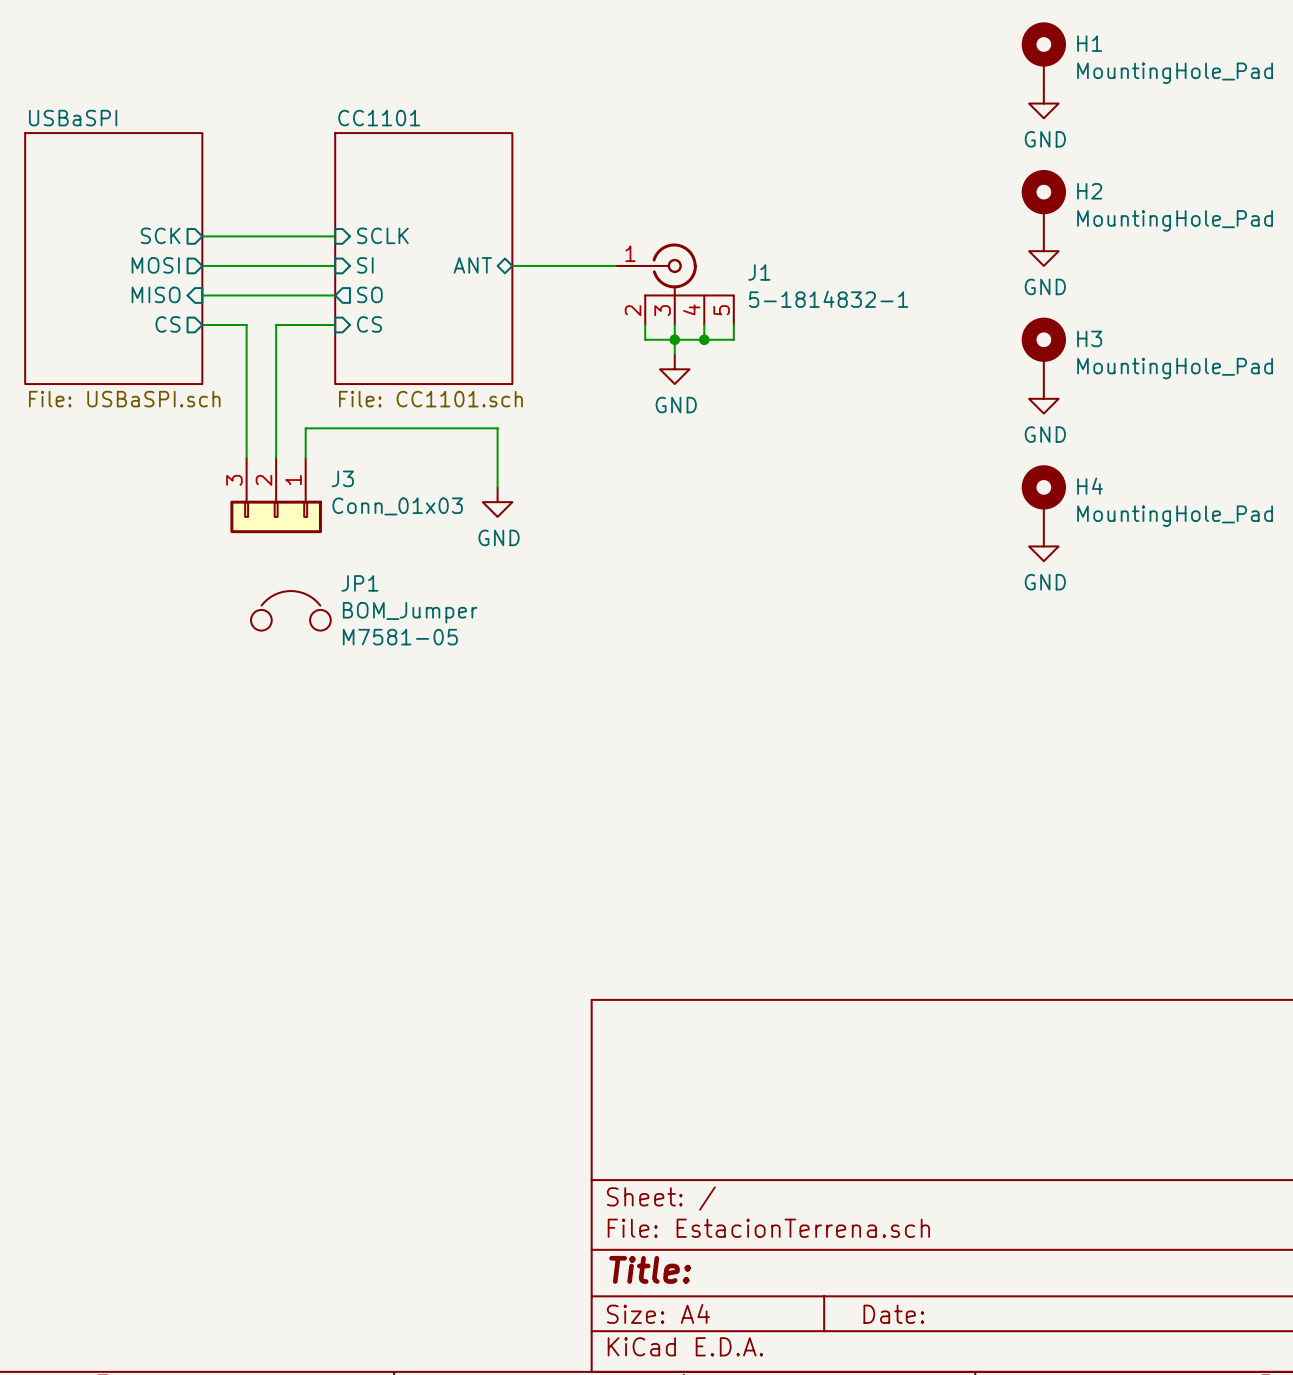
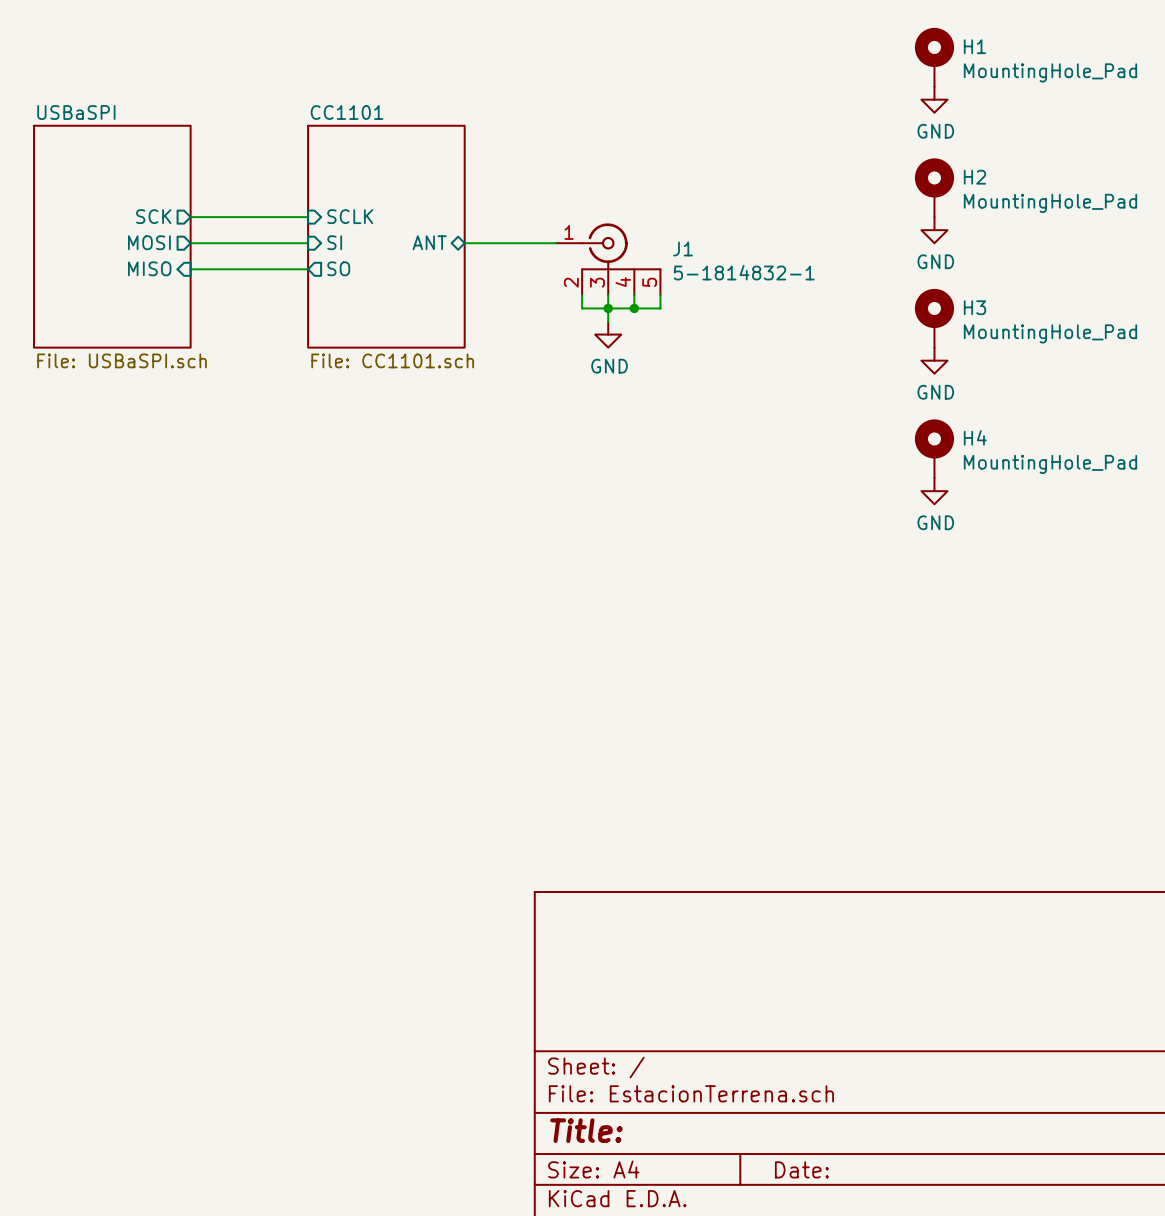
sheet pin: CS (168, 324) -> none
wire: (202, 324) (246, 324) (246, 457) -> none
wire: (335, 324) (276, 324) (276, 457) -> none
sheet pin: CS (369, 324) -> none
wire: (305, 457) (305, 428) (497, 428) (497, 487) -> none
J3: Conn_01x03 (276, 495) -> none
power symbol: GND (497, 502) -> none
JP1: BOM_Jumper (290, 610) -> none

